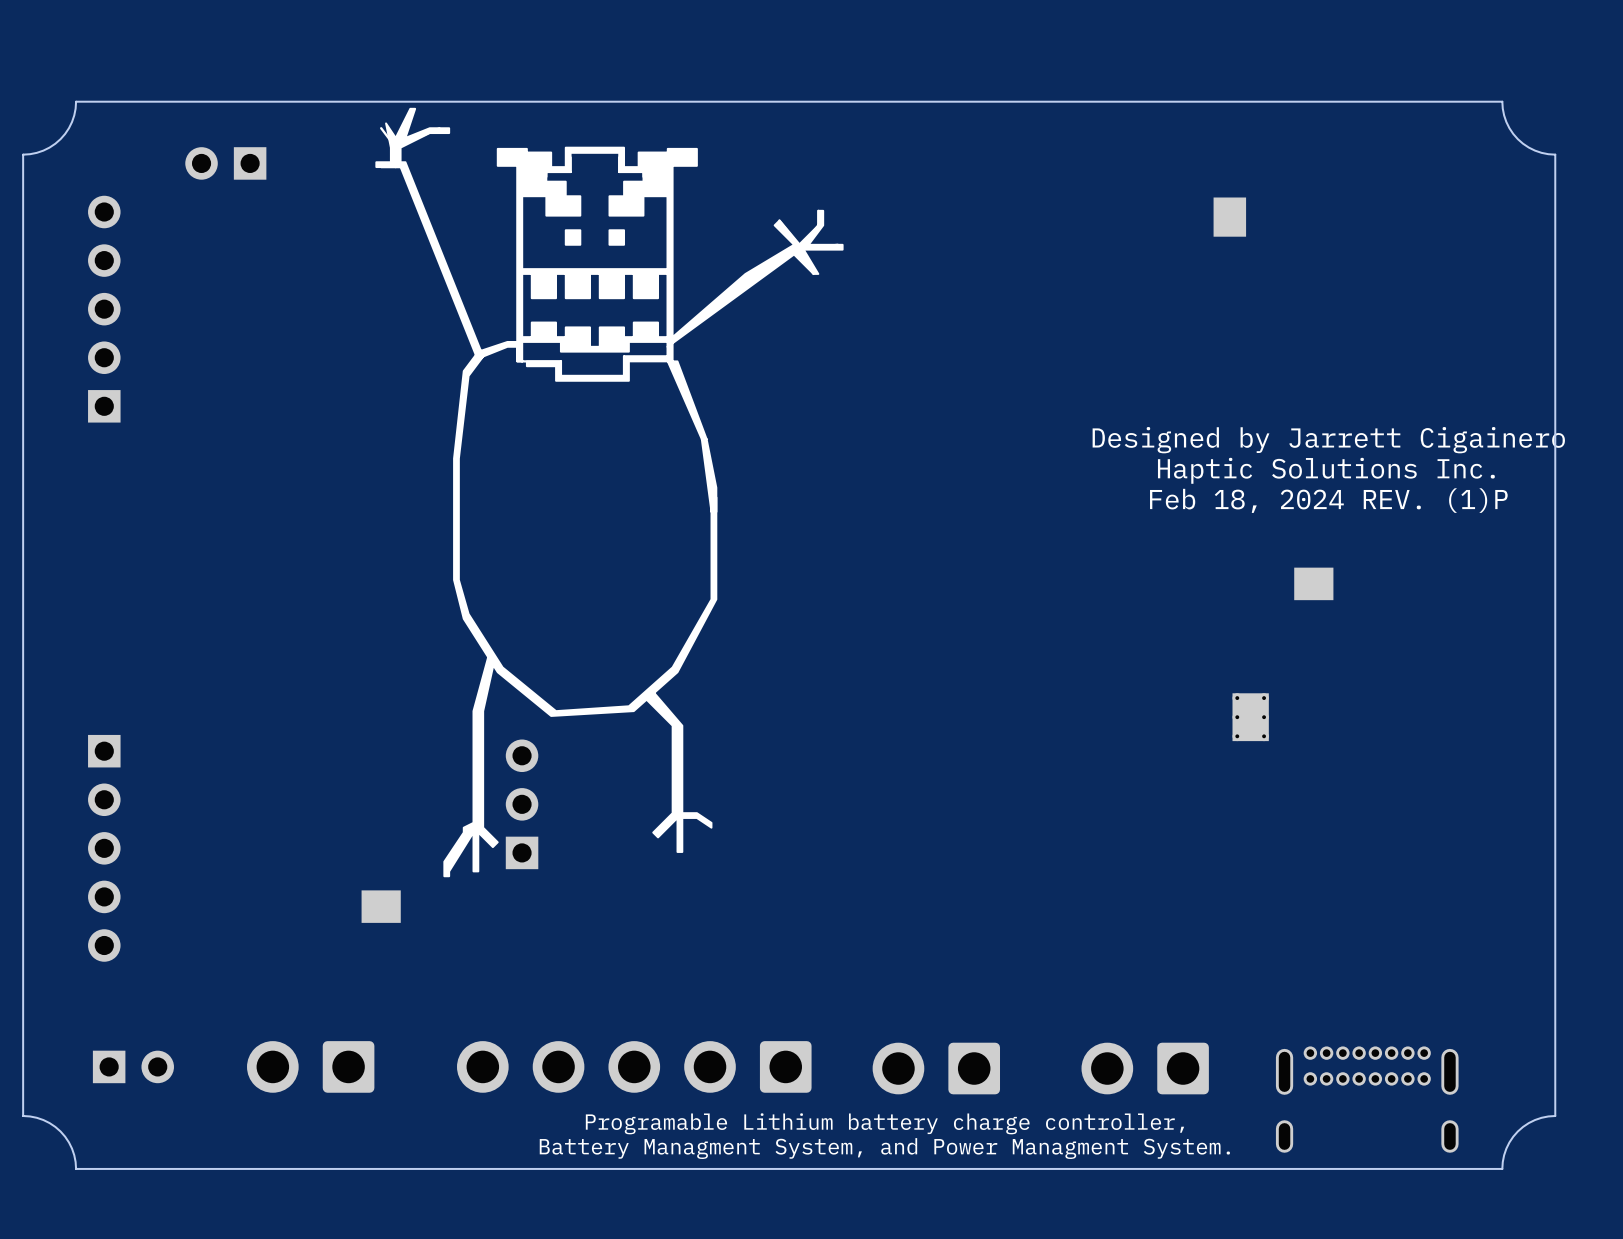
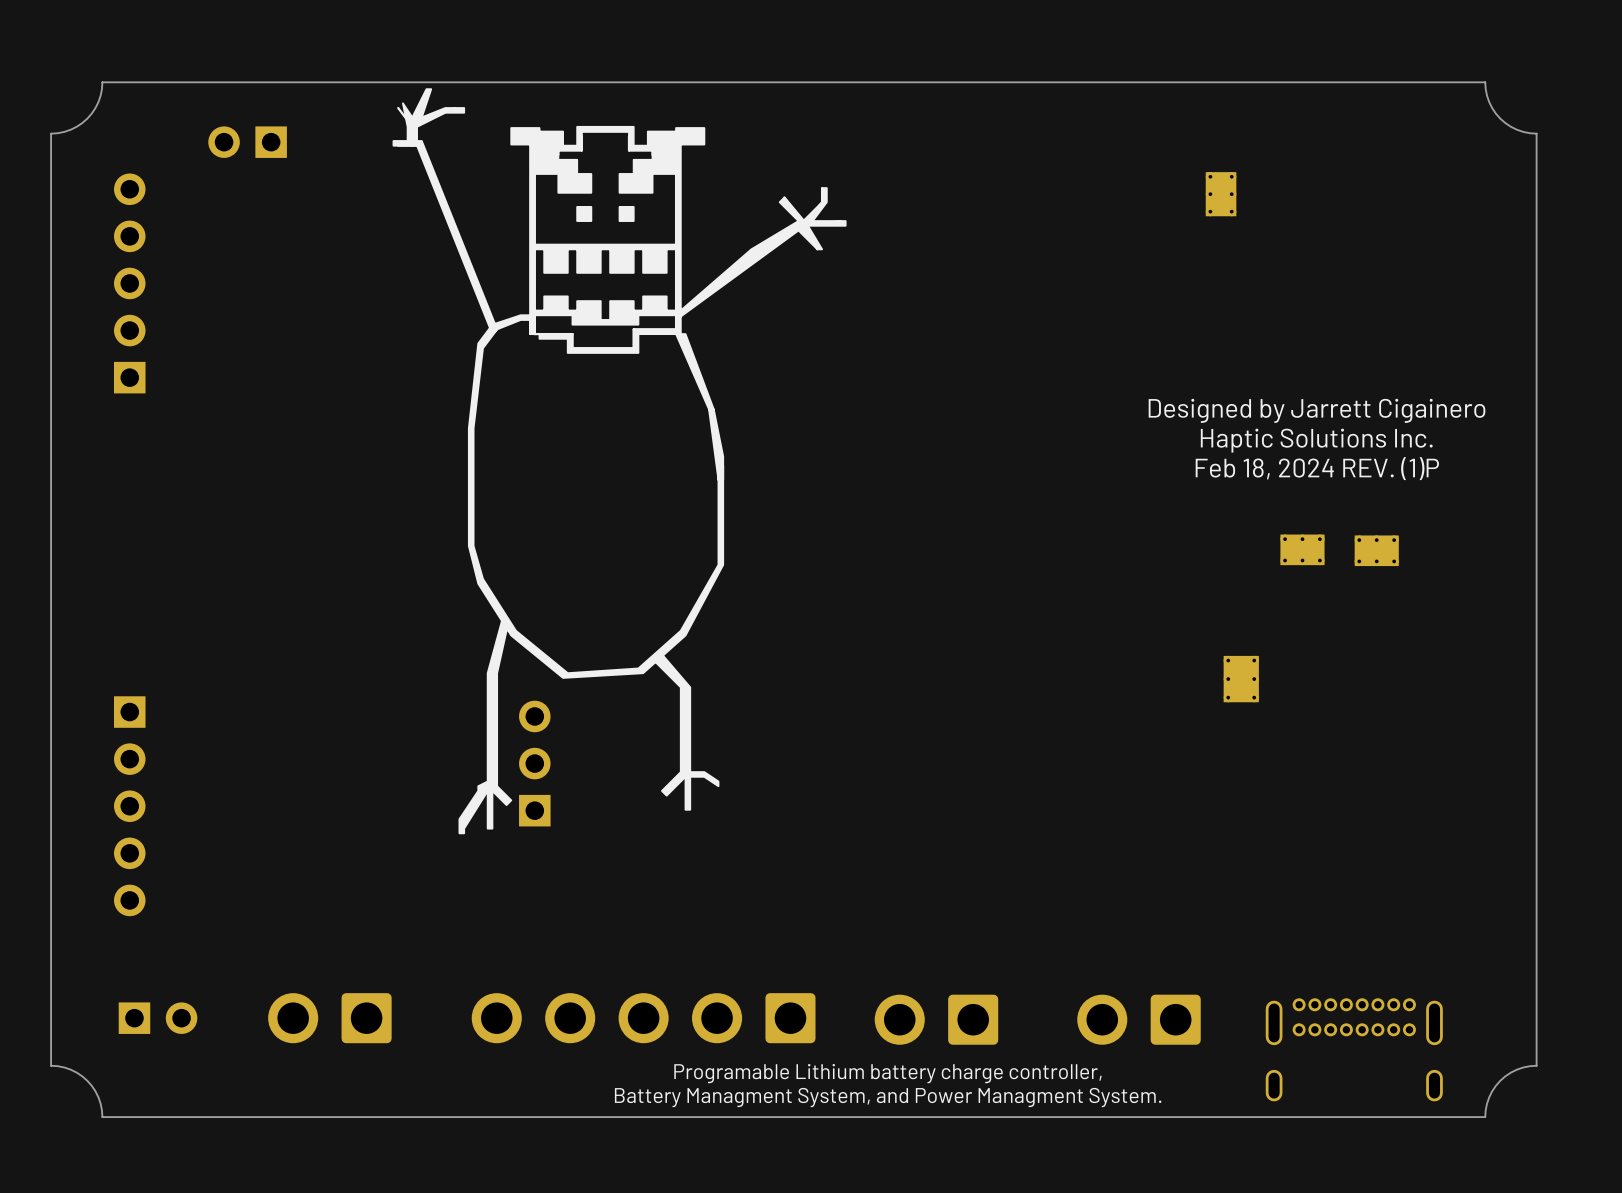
part footprint: [1213, 197, 1247, 237] -> [1205, 172, 1237, 217]
part footprint: [1294, 567, 1334, 601] -> [1280, 534, 1325, 566]
part: none -> (1376, 550)
part: (381, 906) -> none

